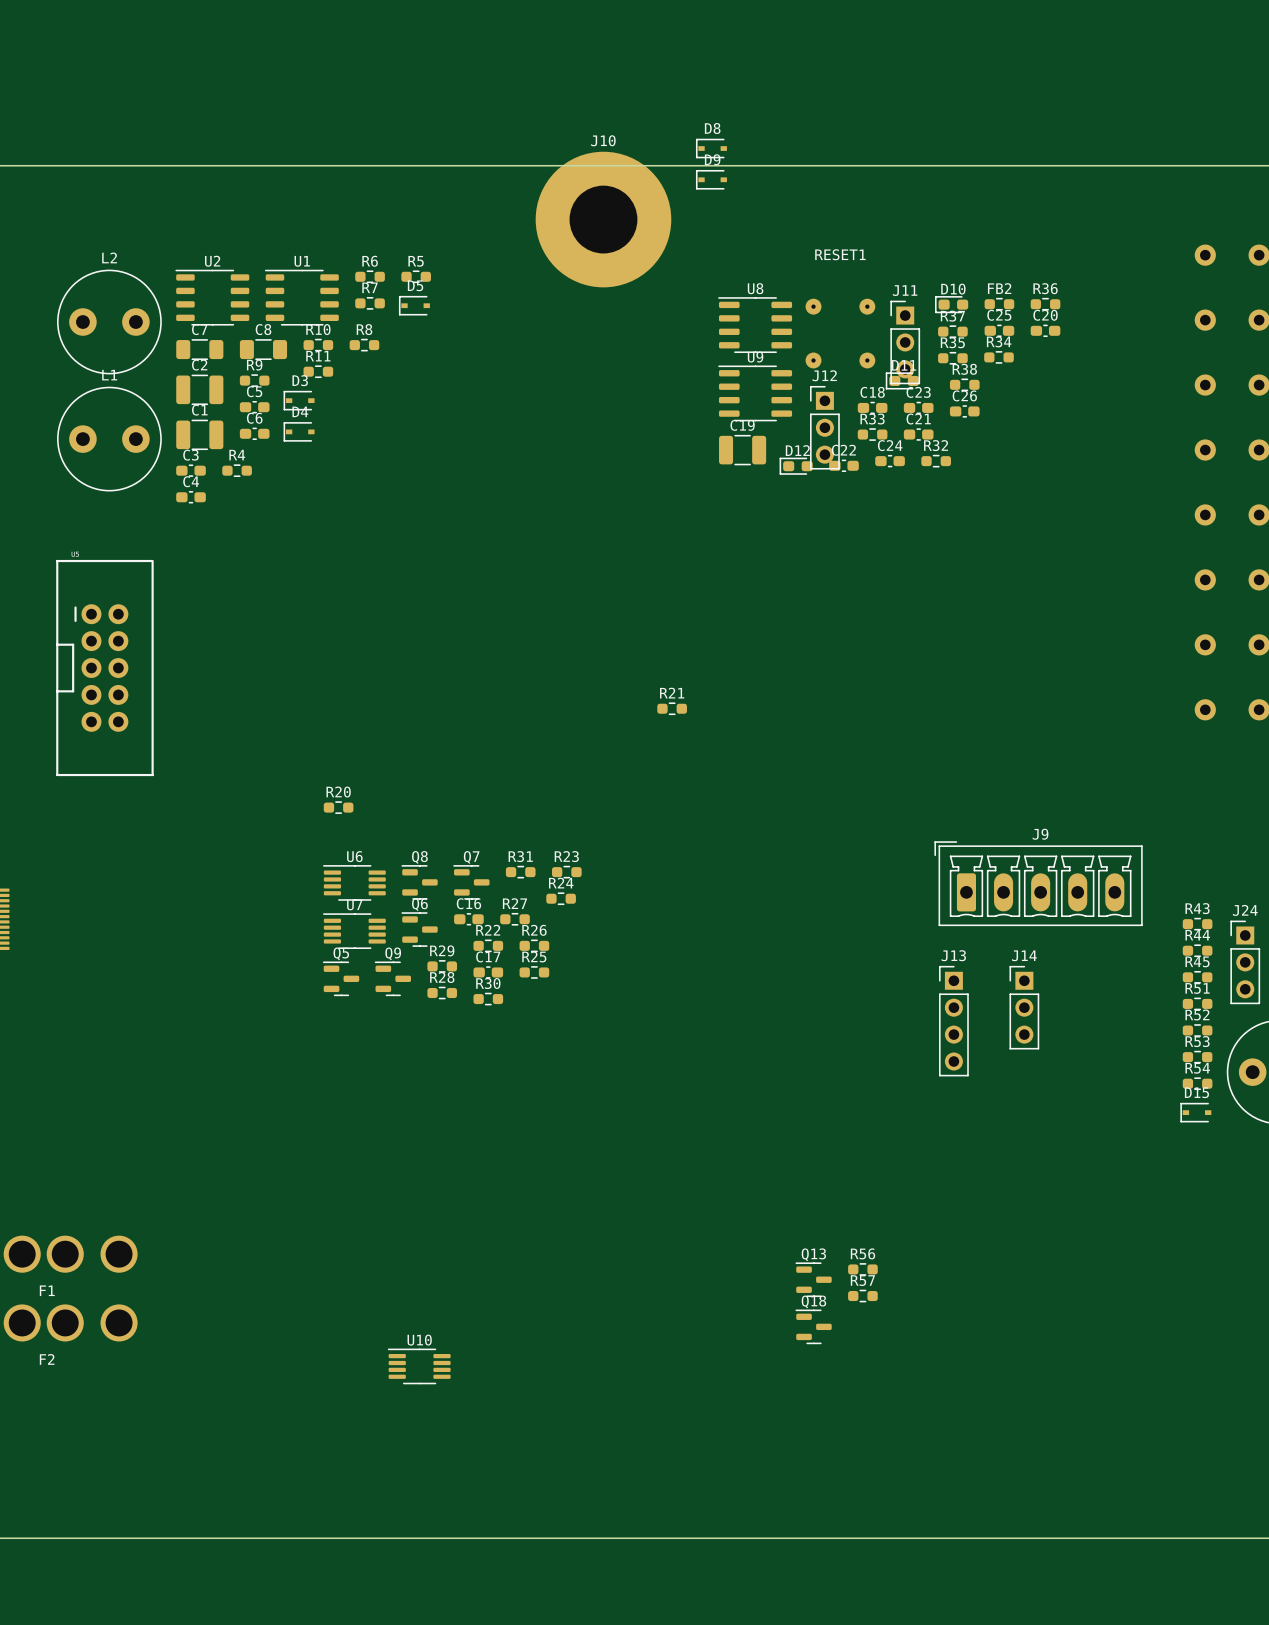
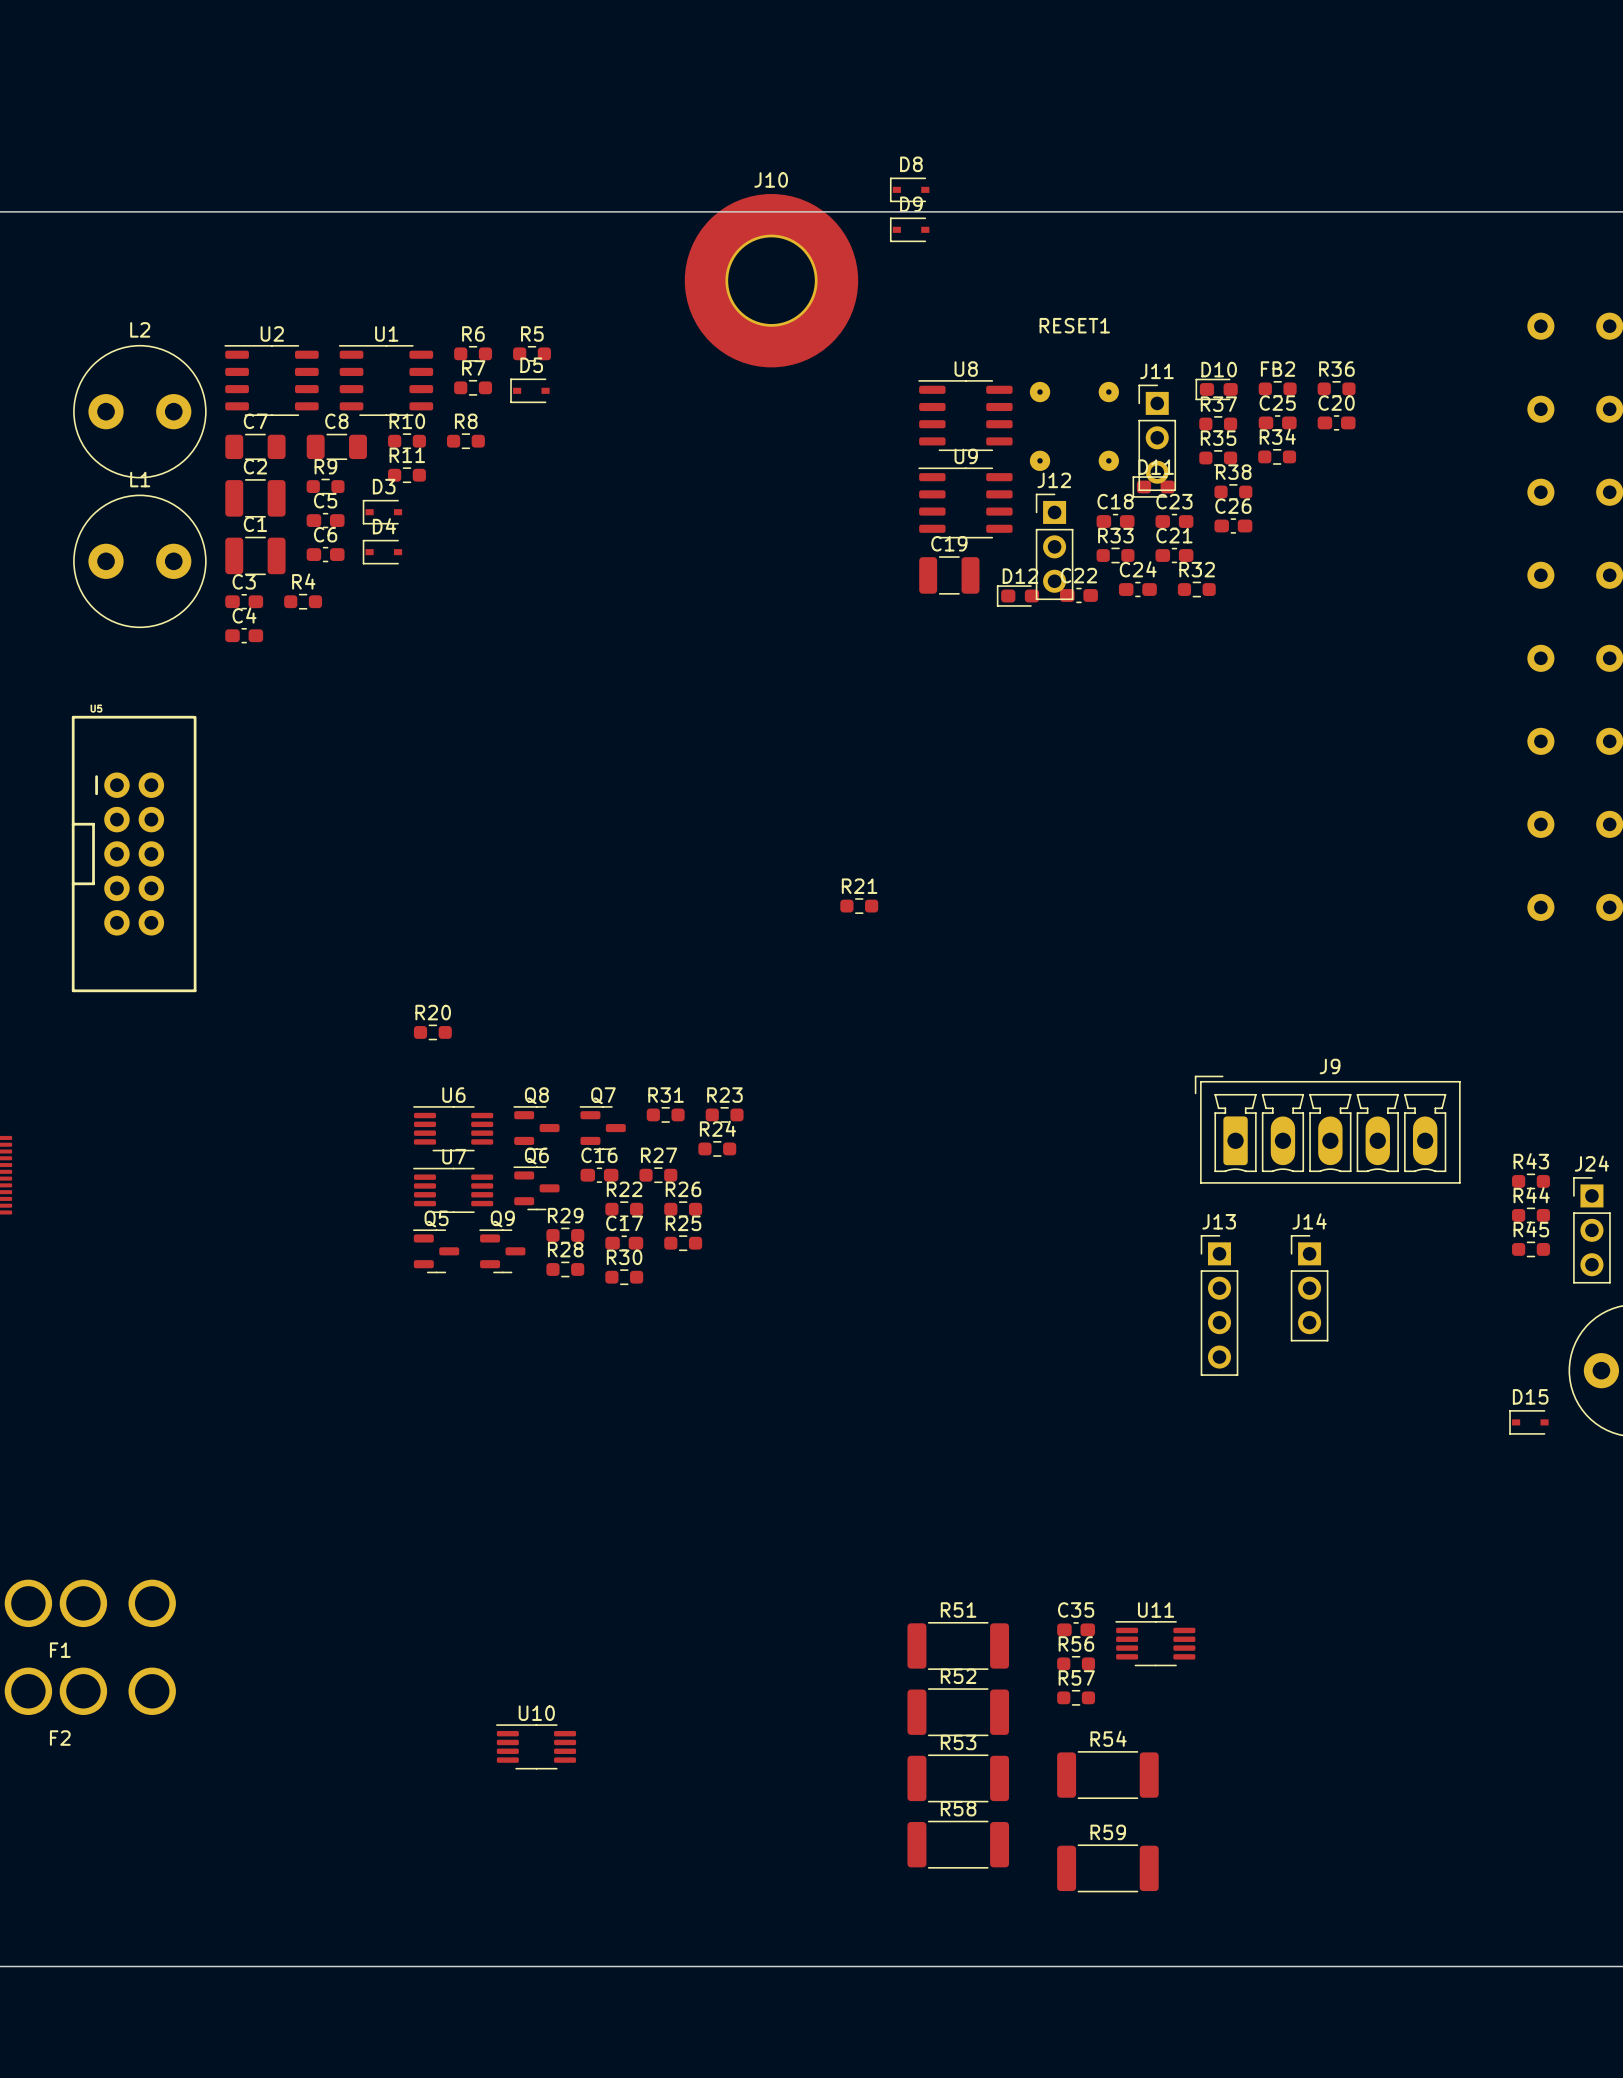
R51 footprint: [1182, 997, 1213, 1011] -> [907, 1621, 1010, 1670]
R52 footprint: [1182, 1024, 1213, 1037] -> [907, 1688, 1010, 1737]
R53 footprint: [1182, 1050, 1213, 1064] -> [907, 1754, 1010, 1803]
R54 footprint: [1182, 1077, 1213, 1090] -> [1057, 1751, 1159, 1800]
R56 position: (862, 1269) -> (1076, 1663)
C35: none -> (1076, 1629)
Q13: (813, 1279) -> none
U11: none -> (1155, 1643)
R57 position: (862, 1296) -> (1076, 1697)
Q18: (813, 1326) -> none
R58: none -> (958, 1844)
R59: none -> (1107, 1868)

